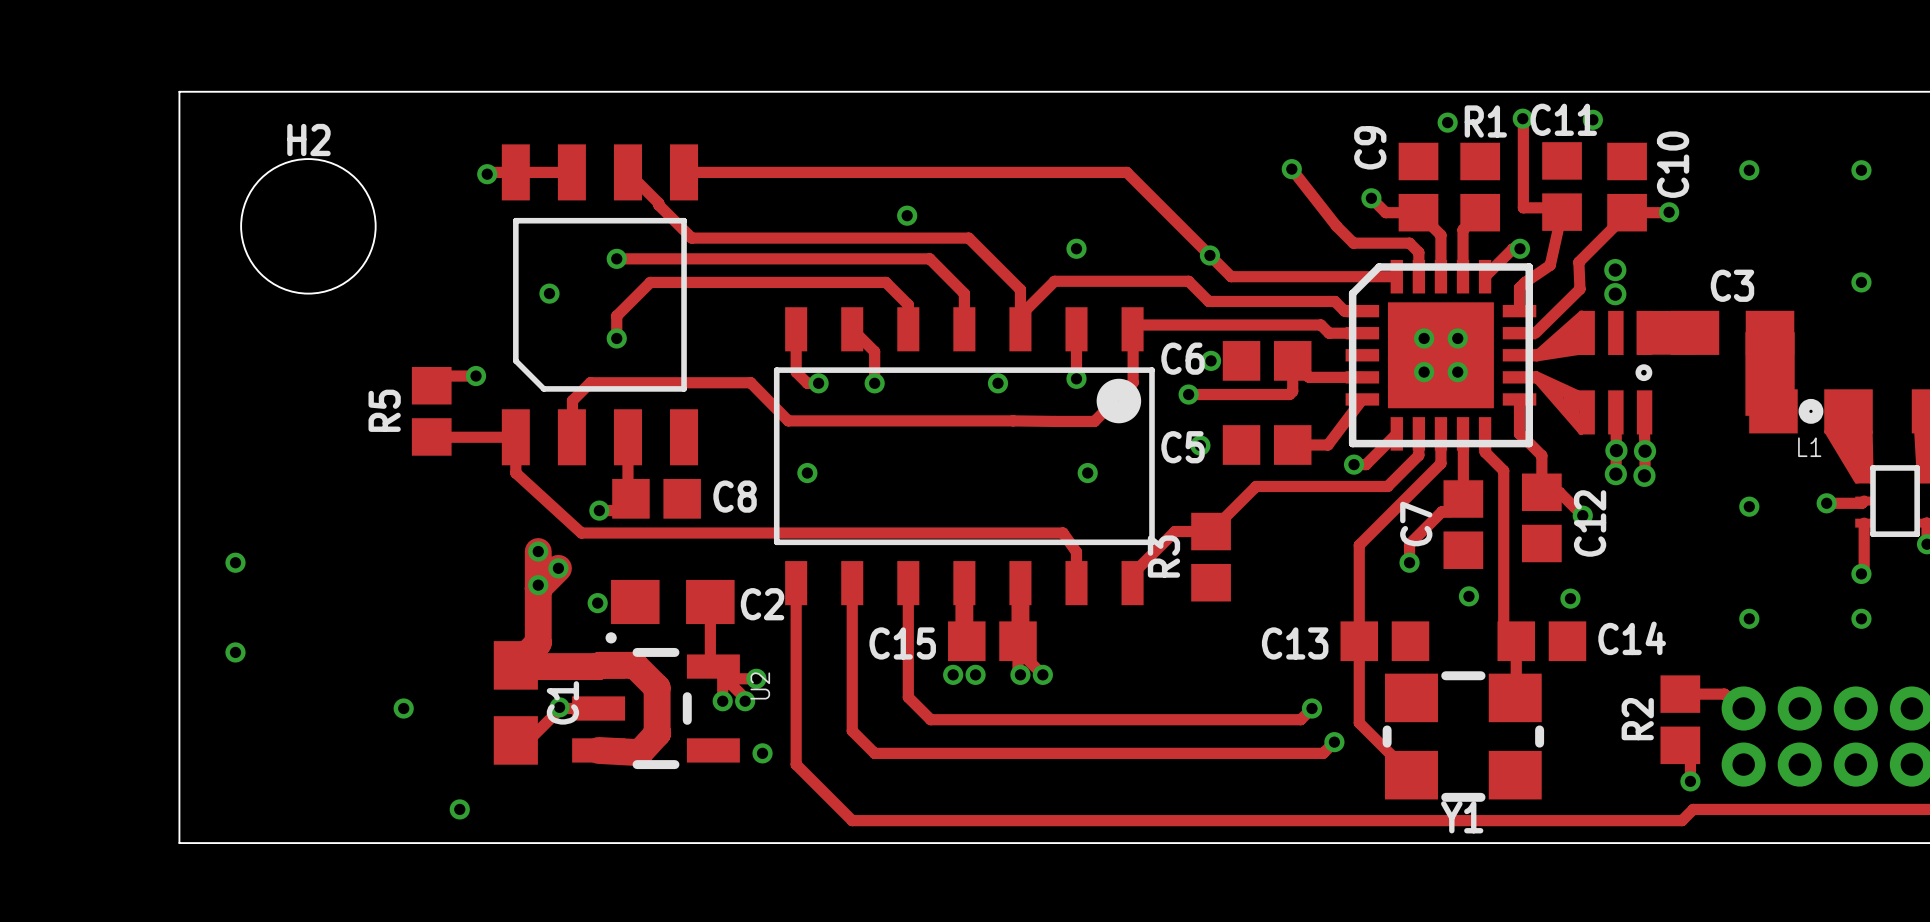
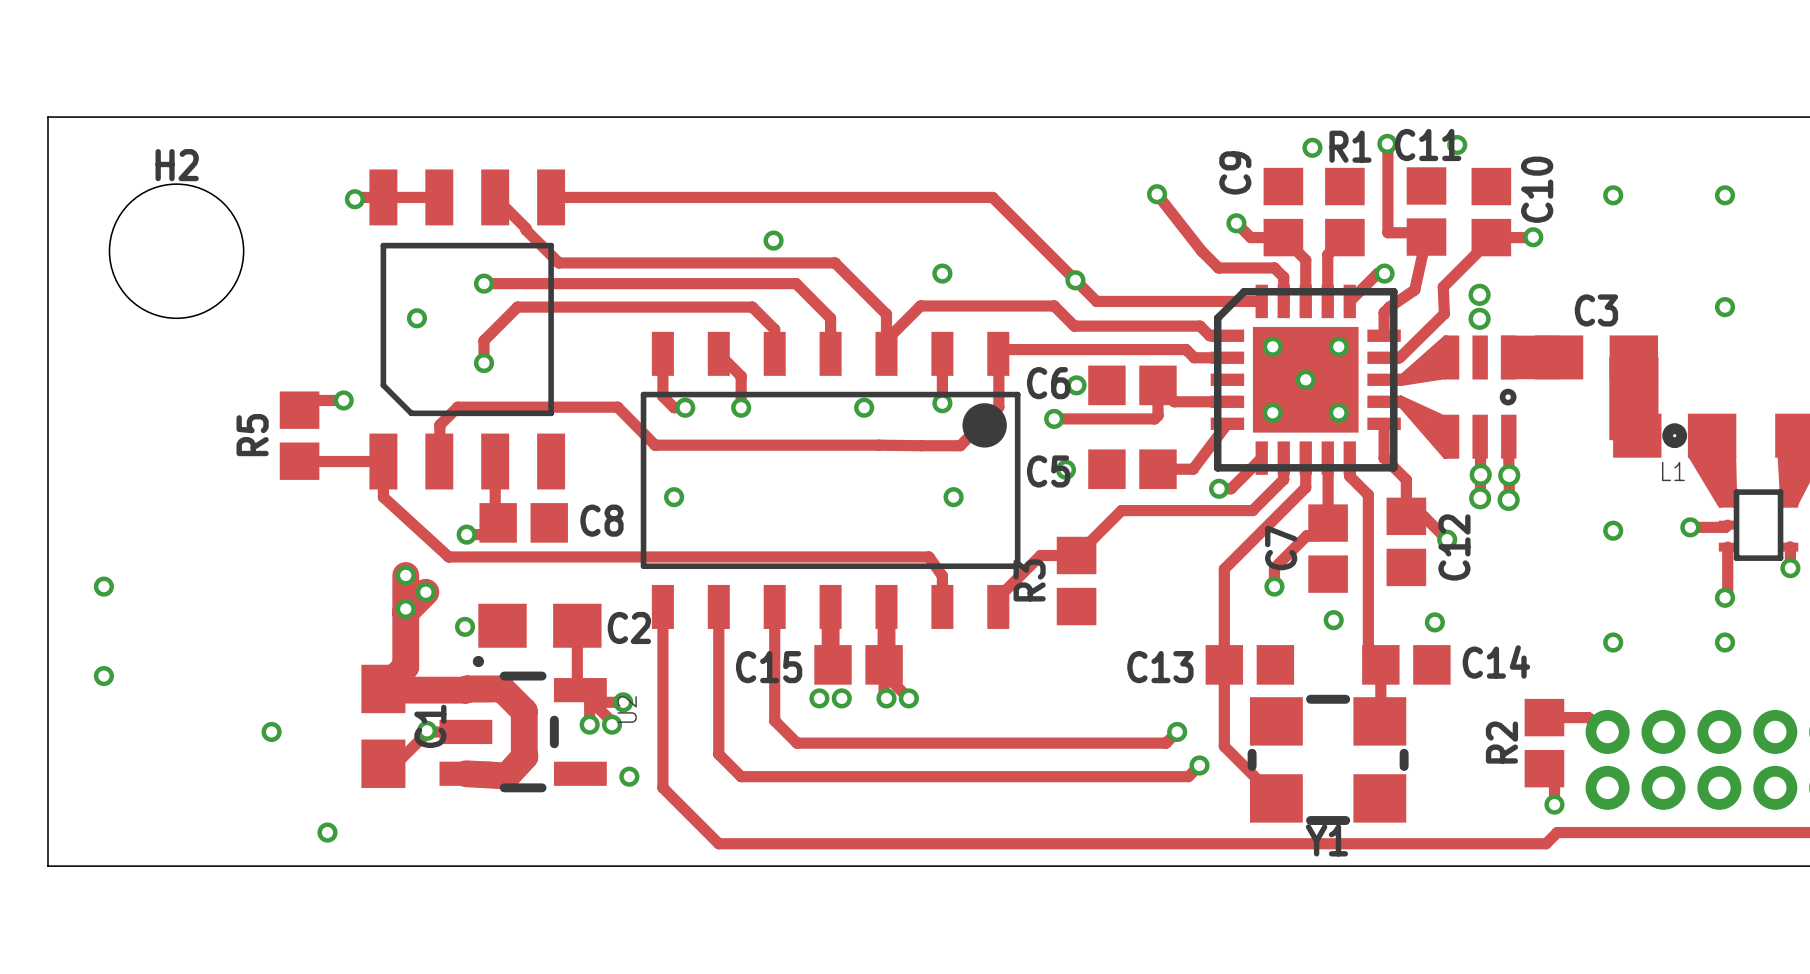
part footprint: [1345, 259, 1537, 451] -> [1210, 284, 1401, 475]
via: (1424, 338) -> none
via: (1457, 338) -> none
via: (1424, 372) -> none
via: (1457, 372) -> none

